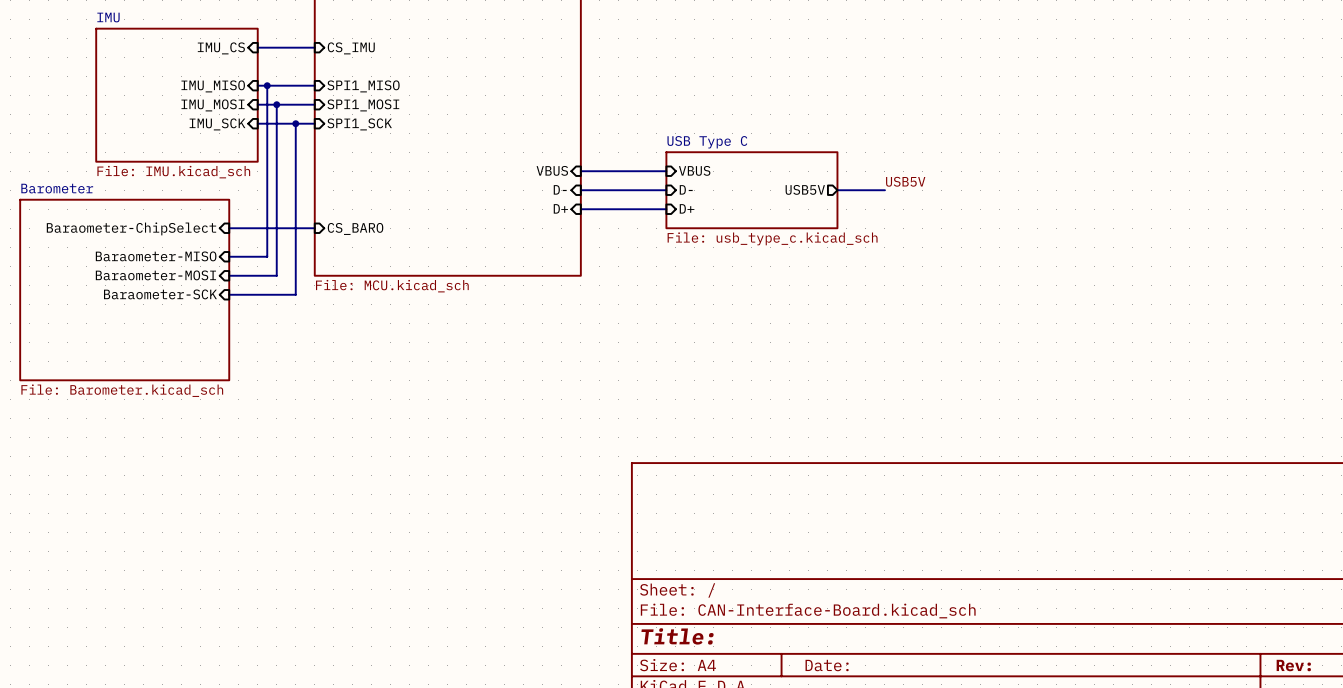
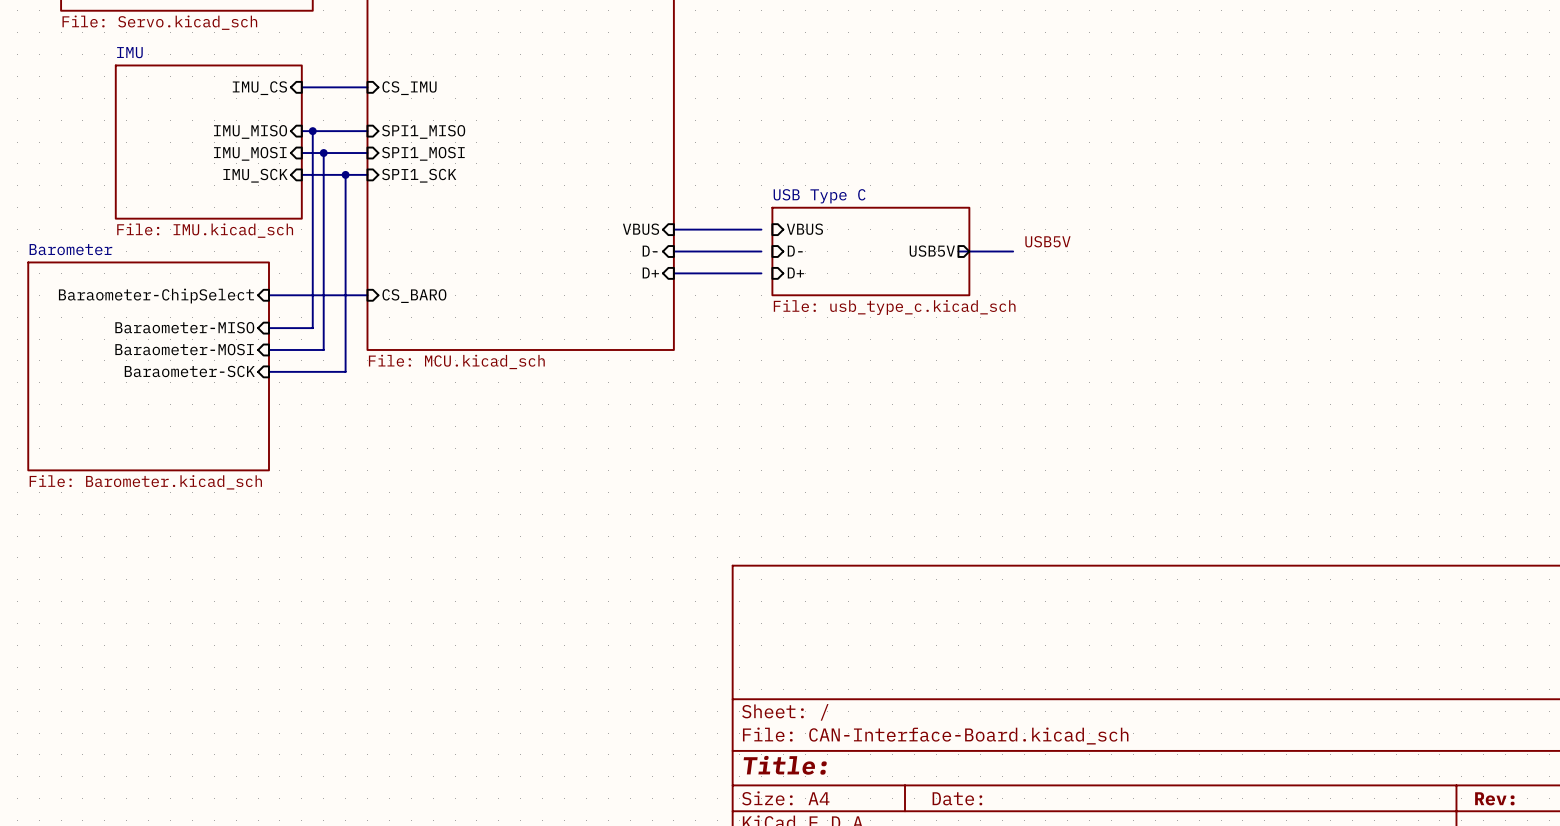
wire: (656, 171) (666, 171) -> none
wire: (656, 190) (666, 190) -> none
wire: (875, 190) (884, 190) -> (958, 251) (969, 251)
wire: (656, 209) (666, 209) -> none

